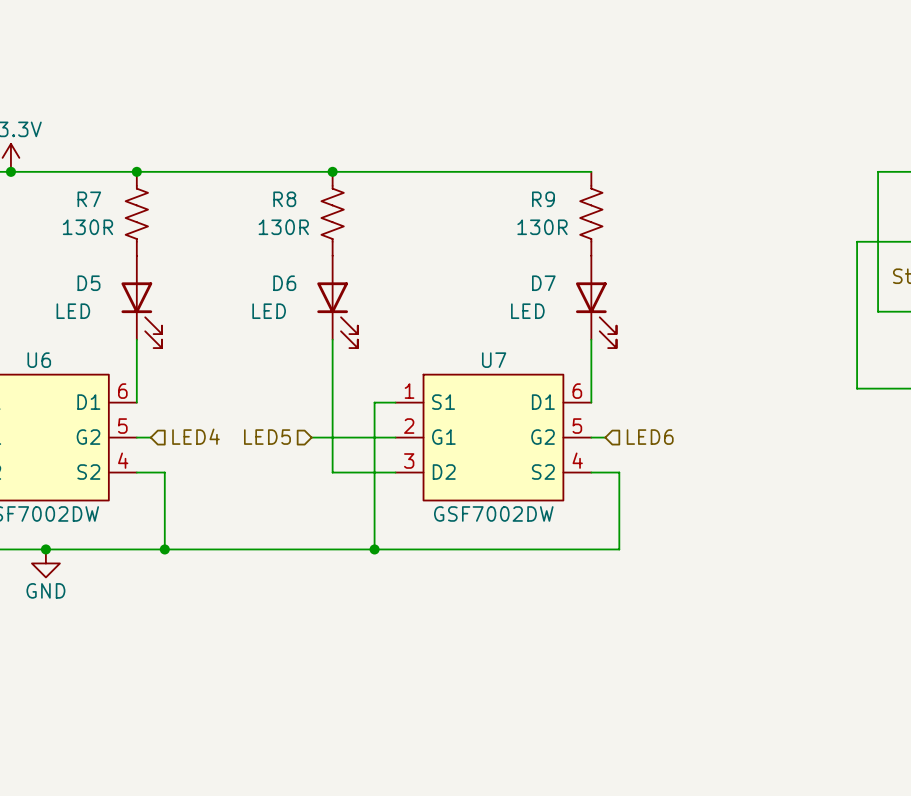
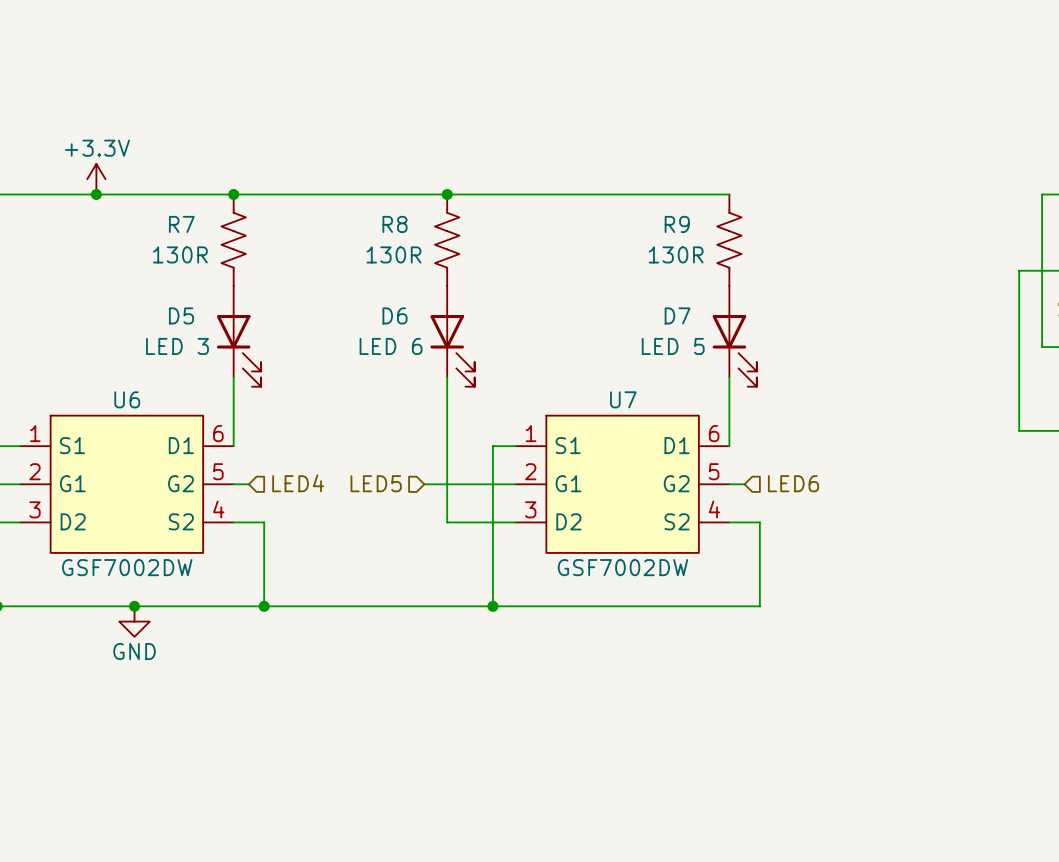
D5 value: LED (73, 311) -> LED 3 (177, 346)
D6 value: LED (269, 311) -> LED 6 (391, 346)
D7 value: LED (527, 311) -> LED 5 (673, 346)

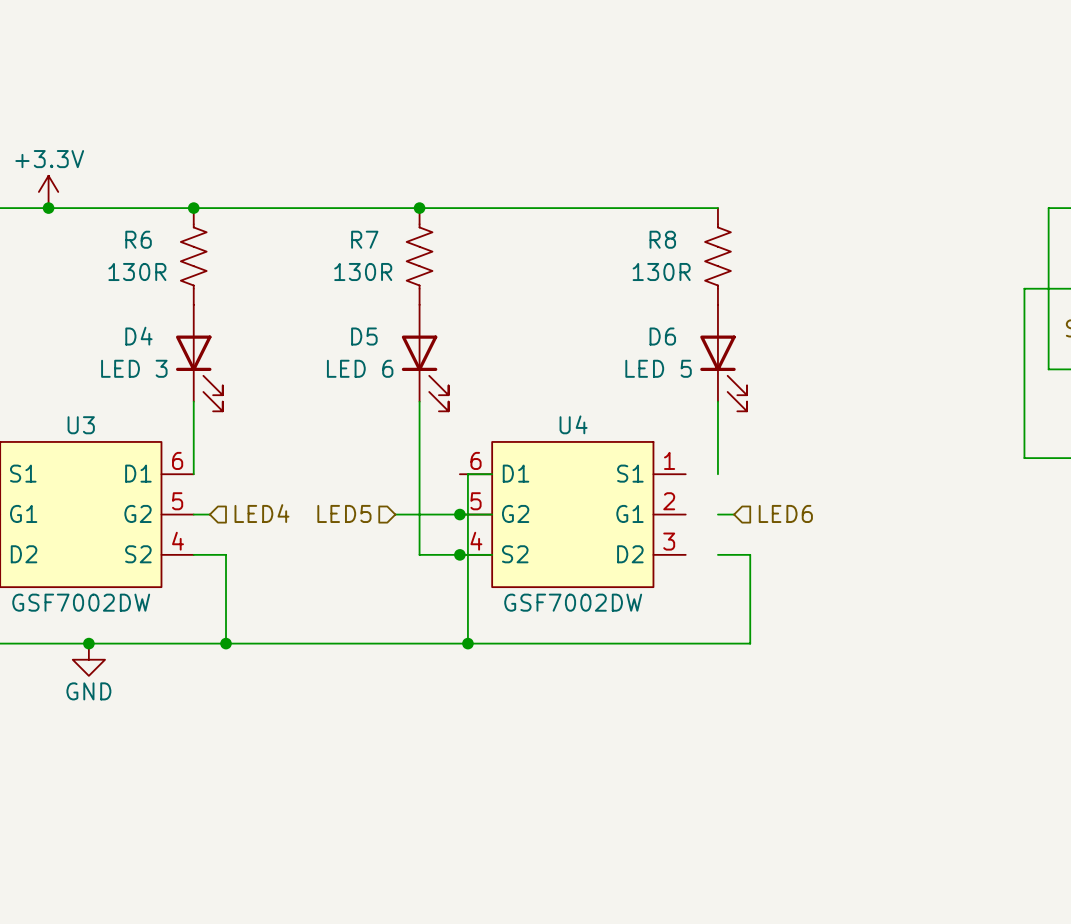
R7 name: R7 (181, 224) -> R6 (138, 239)
R8 name: R8 (395, 224) -> R7 (364, 239)
R9 name: R9 (677, 224) -> R8 (662, 239)
D5 name: D5 (181, 315) -> D4 (138, 336)
D6 name: D6 (395, 315) -> D5 (364, 336)
D7 name: D7 (677, 315) -> D6 (662, 336)
U6 name: U6 (127, 399) -> U3 (81, 425)
junction: none -> (459, 514)
U4: none -> GSF7002DW (572, 514)
U7: GSF7002DW (622, 484) -> none
junction: none -> (459, 554)

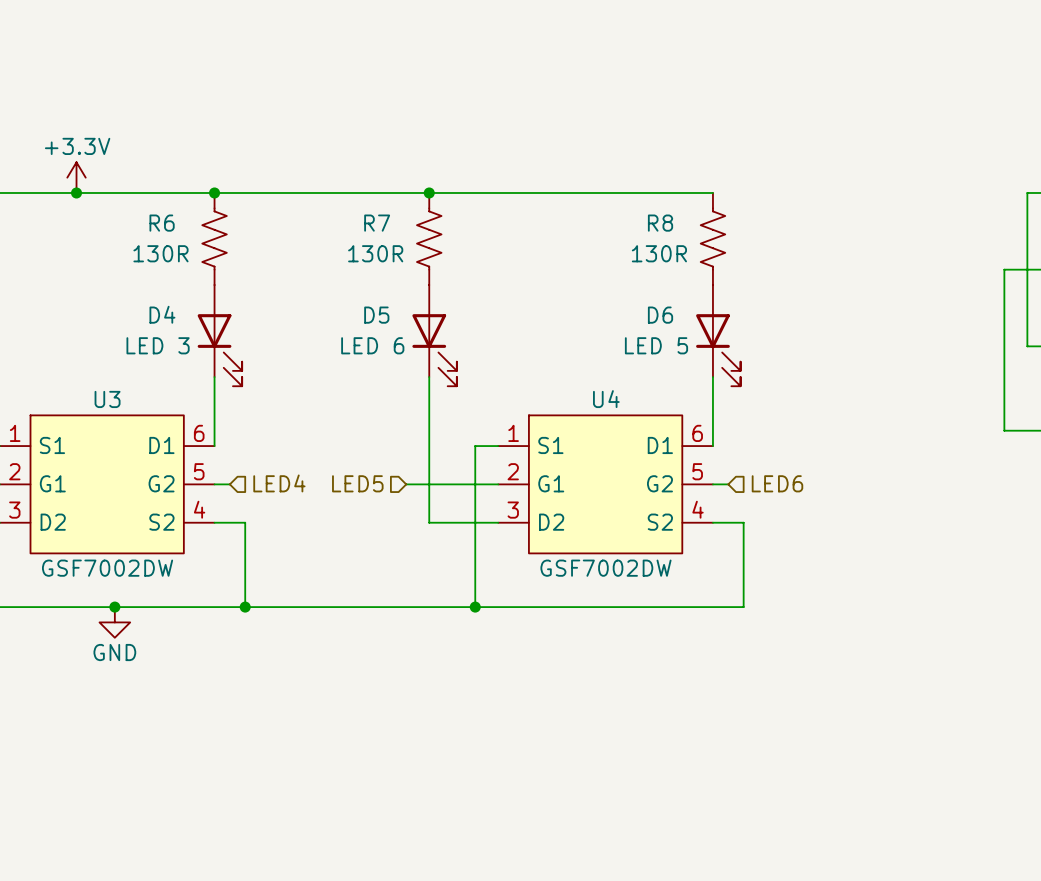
junction: (459, 514) -> none
U4 flip: as is (572, 514) -> left-right (605, 484)
junction: (459, 554) -> none

